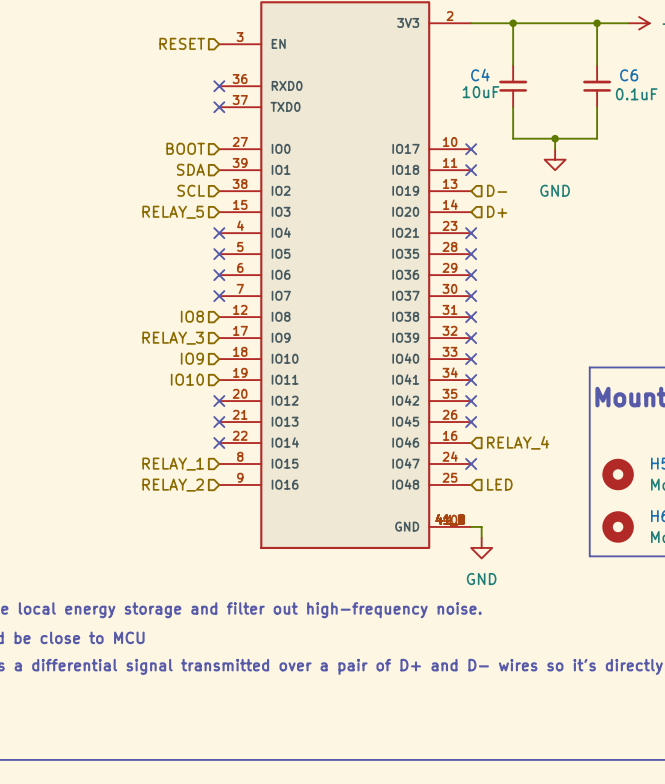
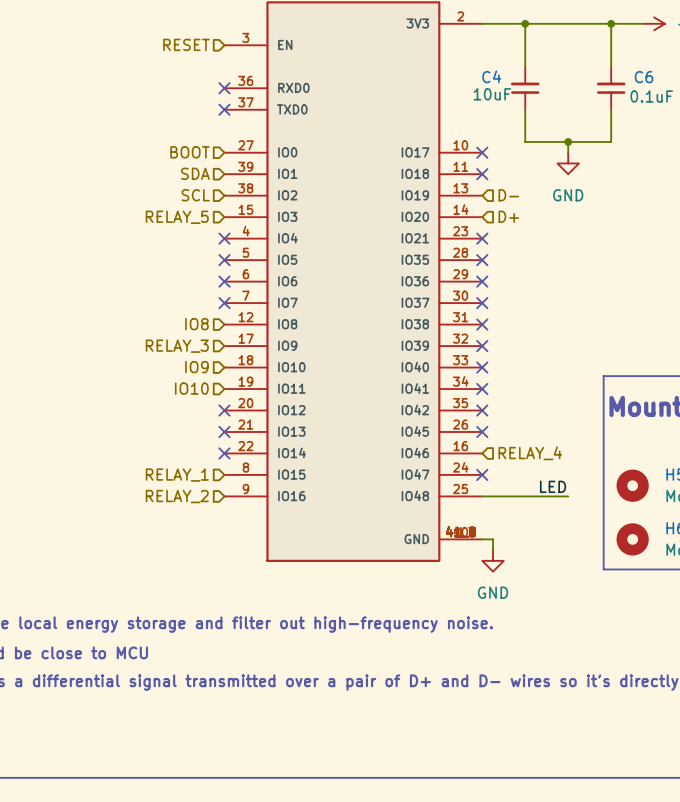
label: none -> LED (553, 486)
wire: none -> (482, 496) (568, 496)
hierarchical label: LED (499, 484) -> none

